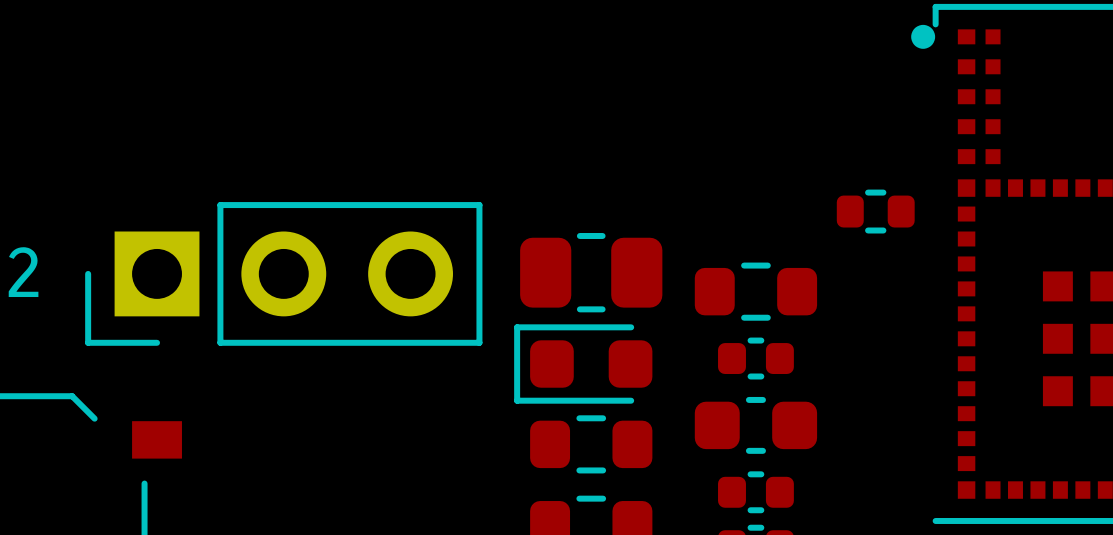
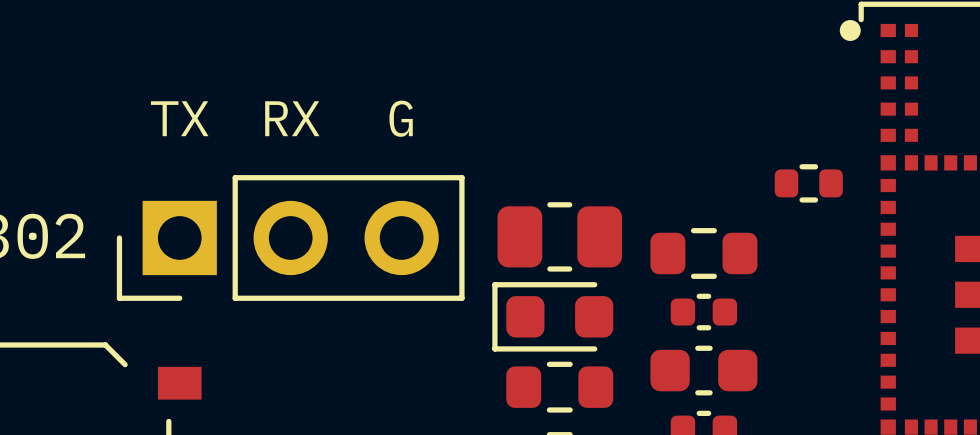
text: none -> TX (179, 118)
text: none -> RX (292, 118)
text: none -> G (401, 118)

